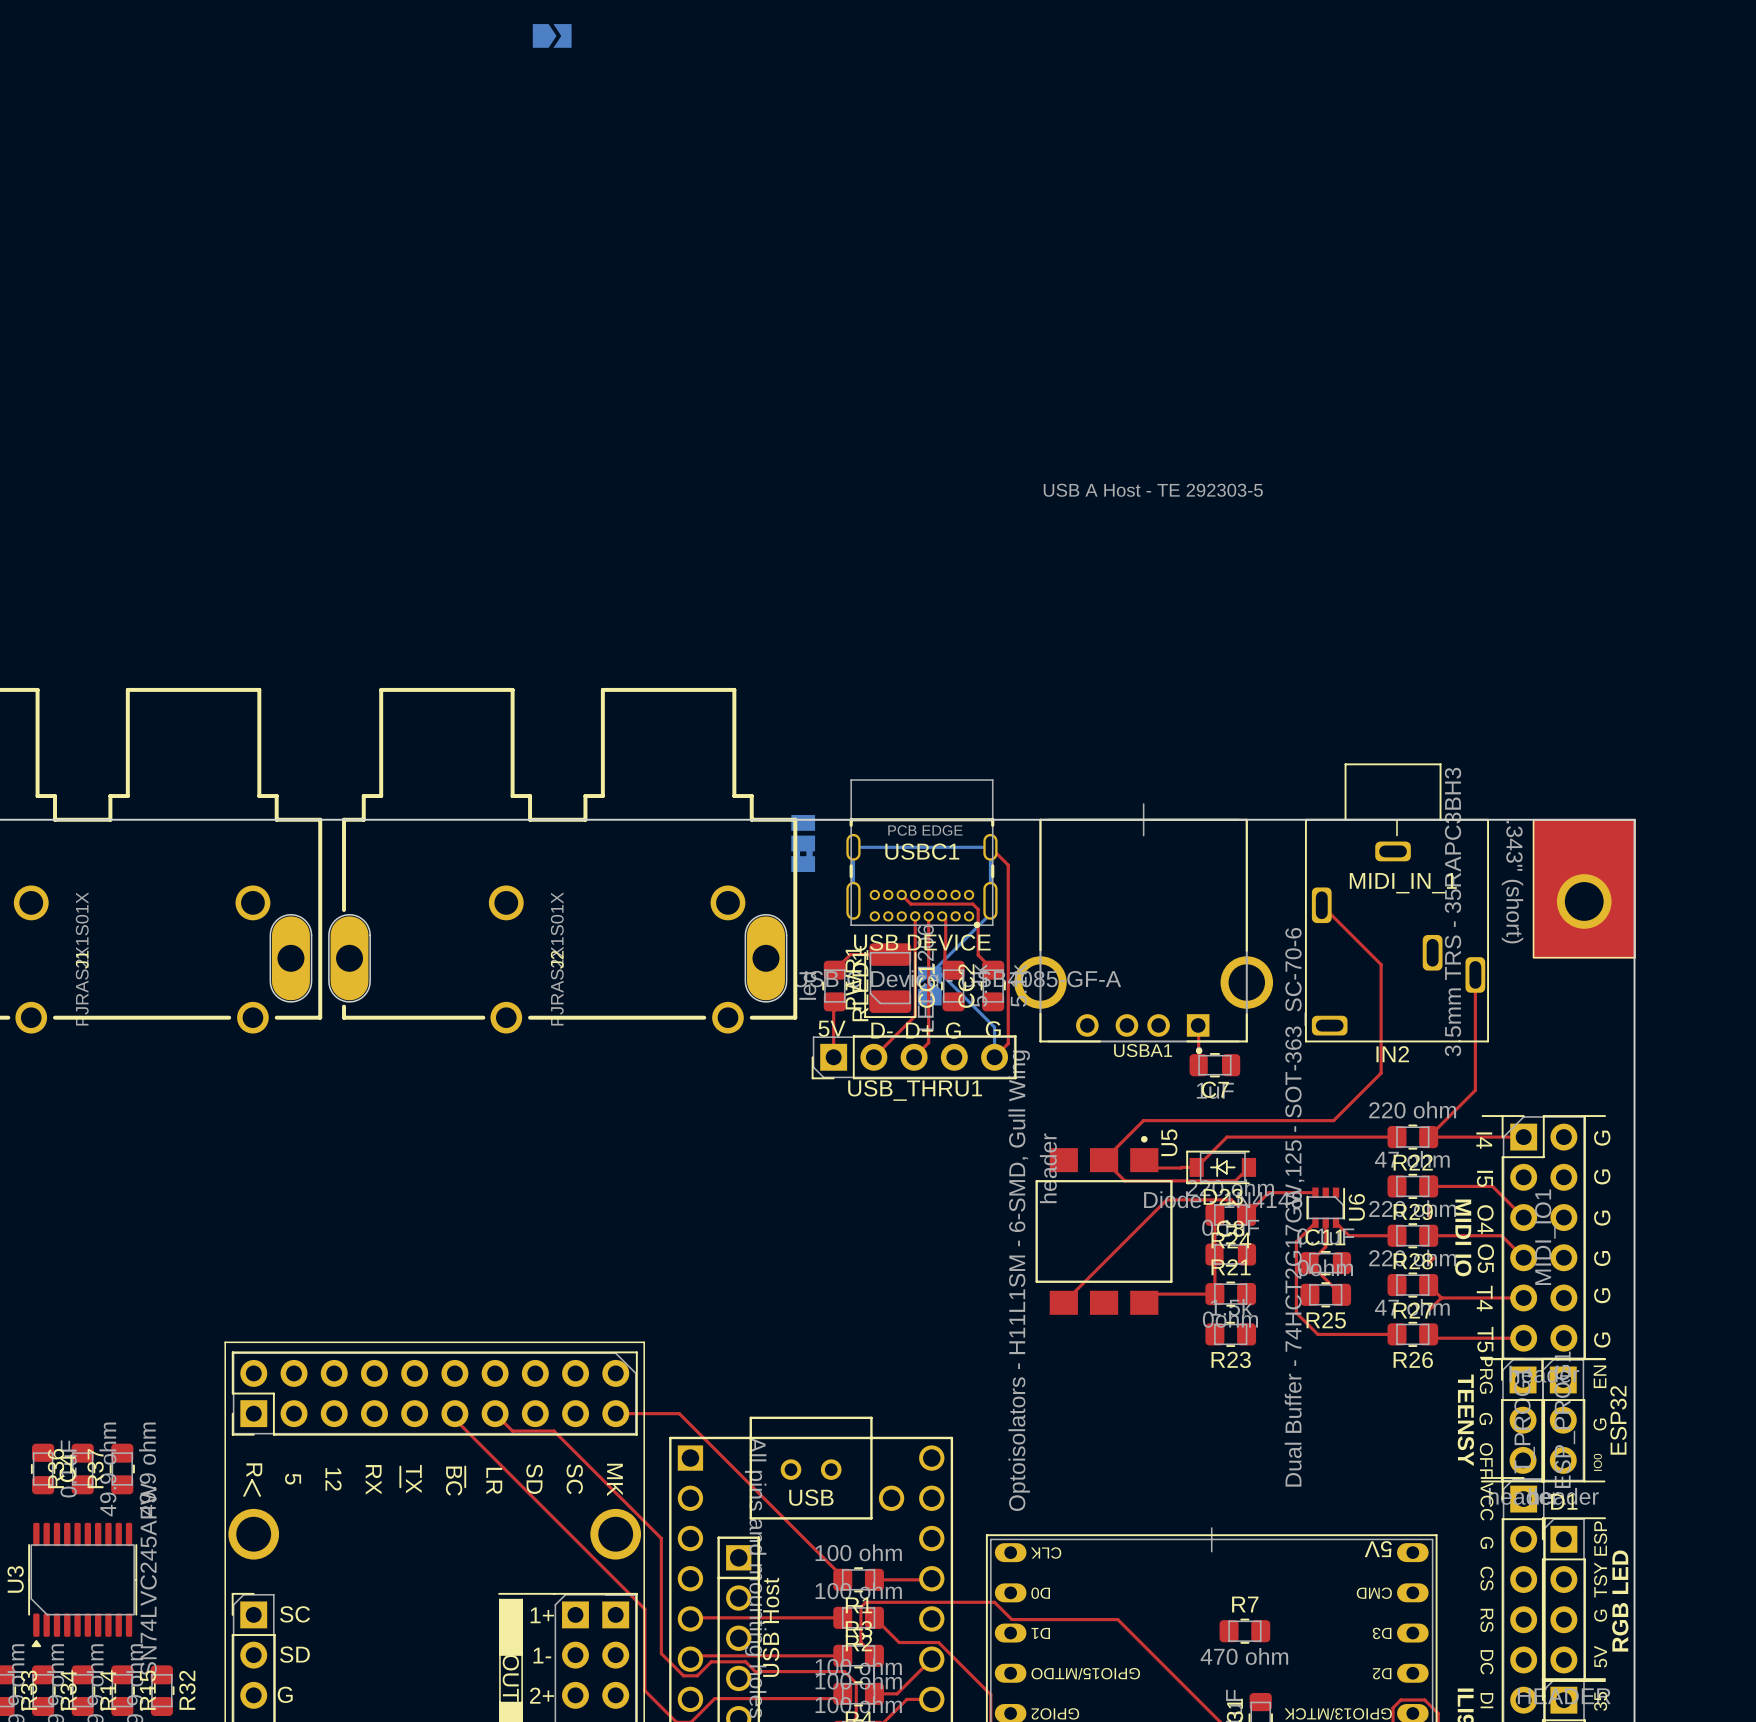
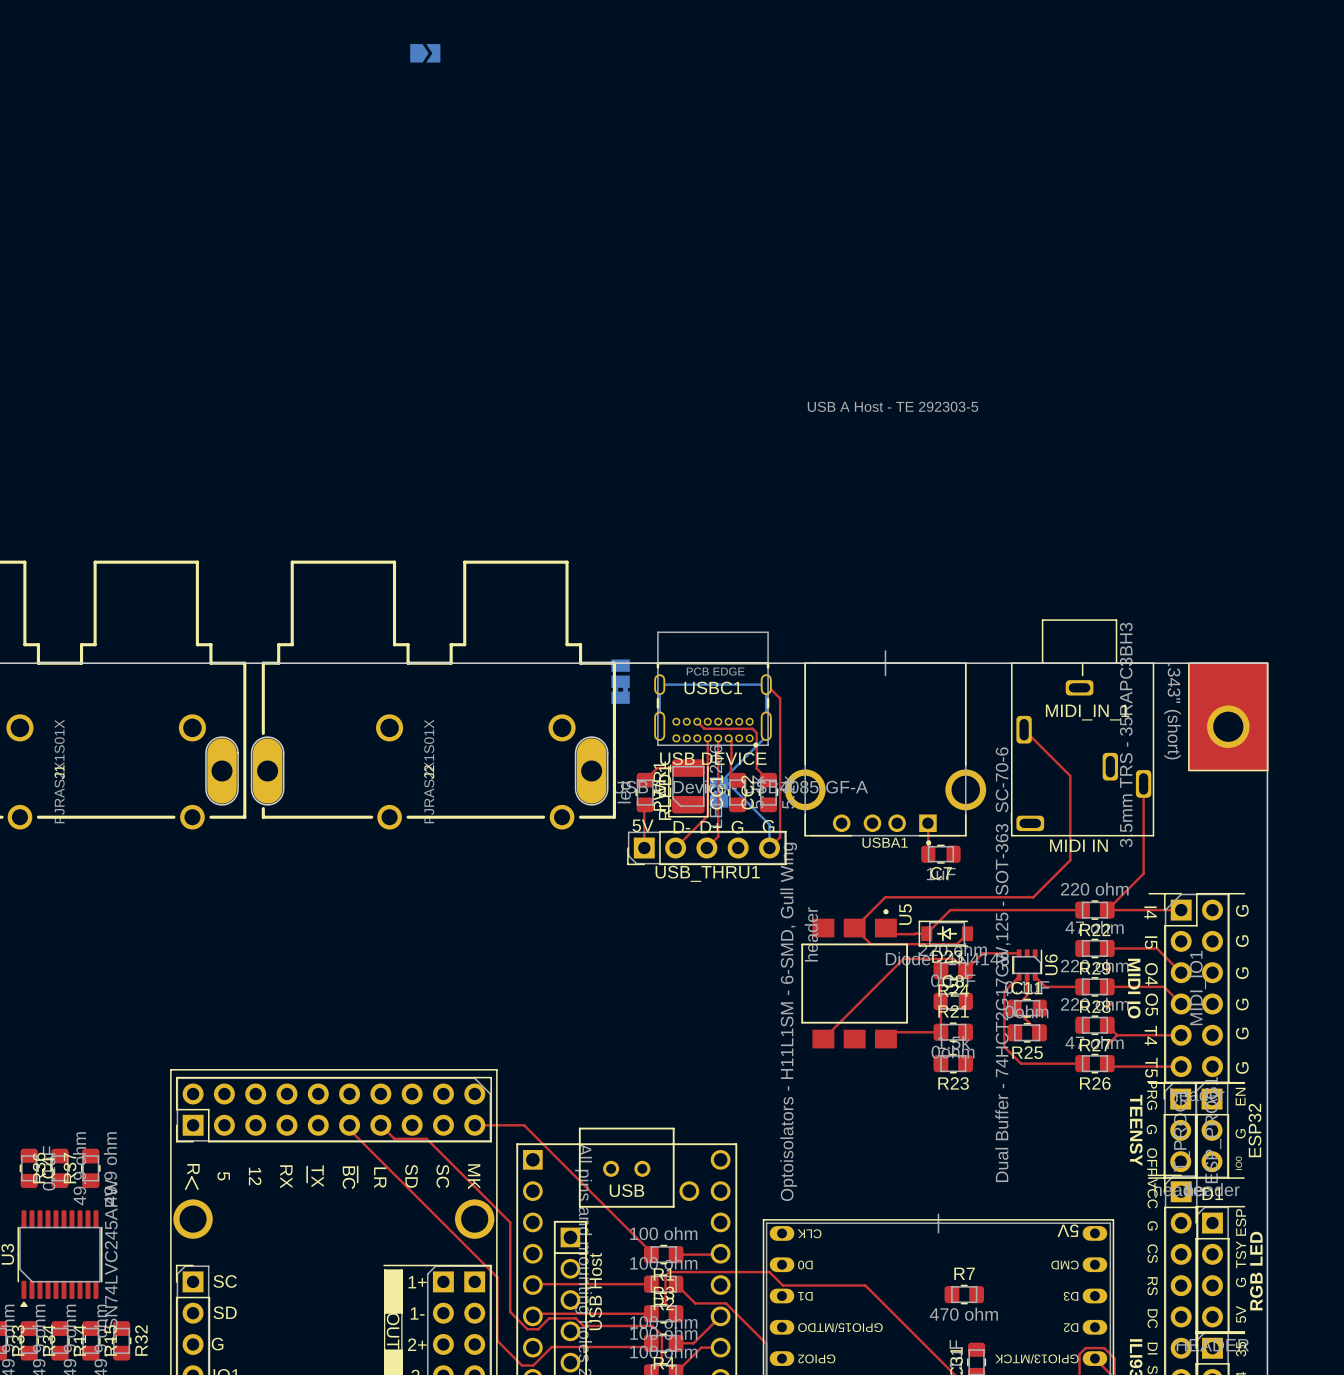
MIDI_IN_1 text: IN2 (1392, 1054) -> MIDI IN (1078, 845)

